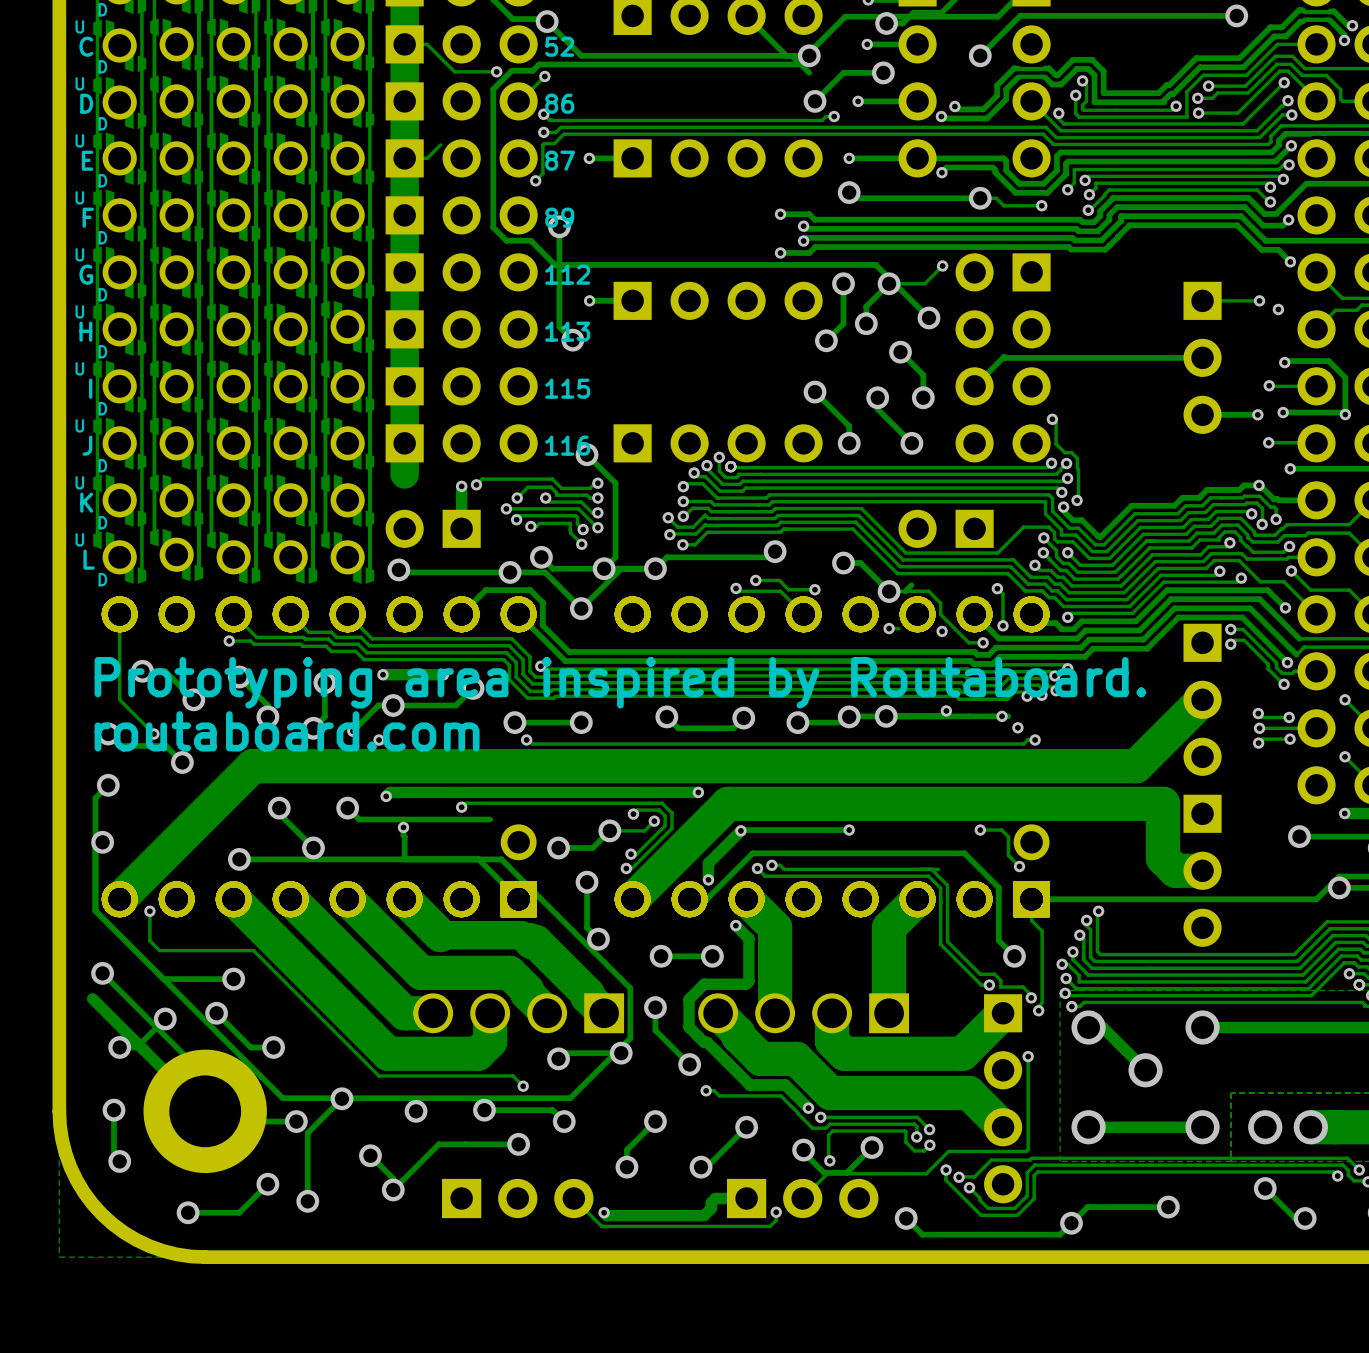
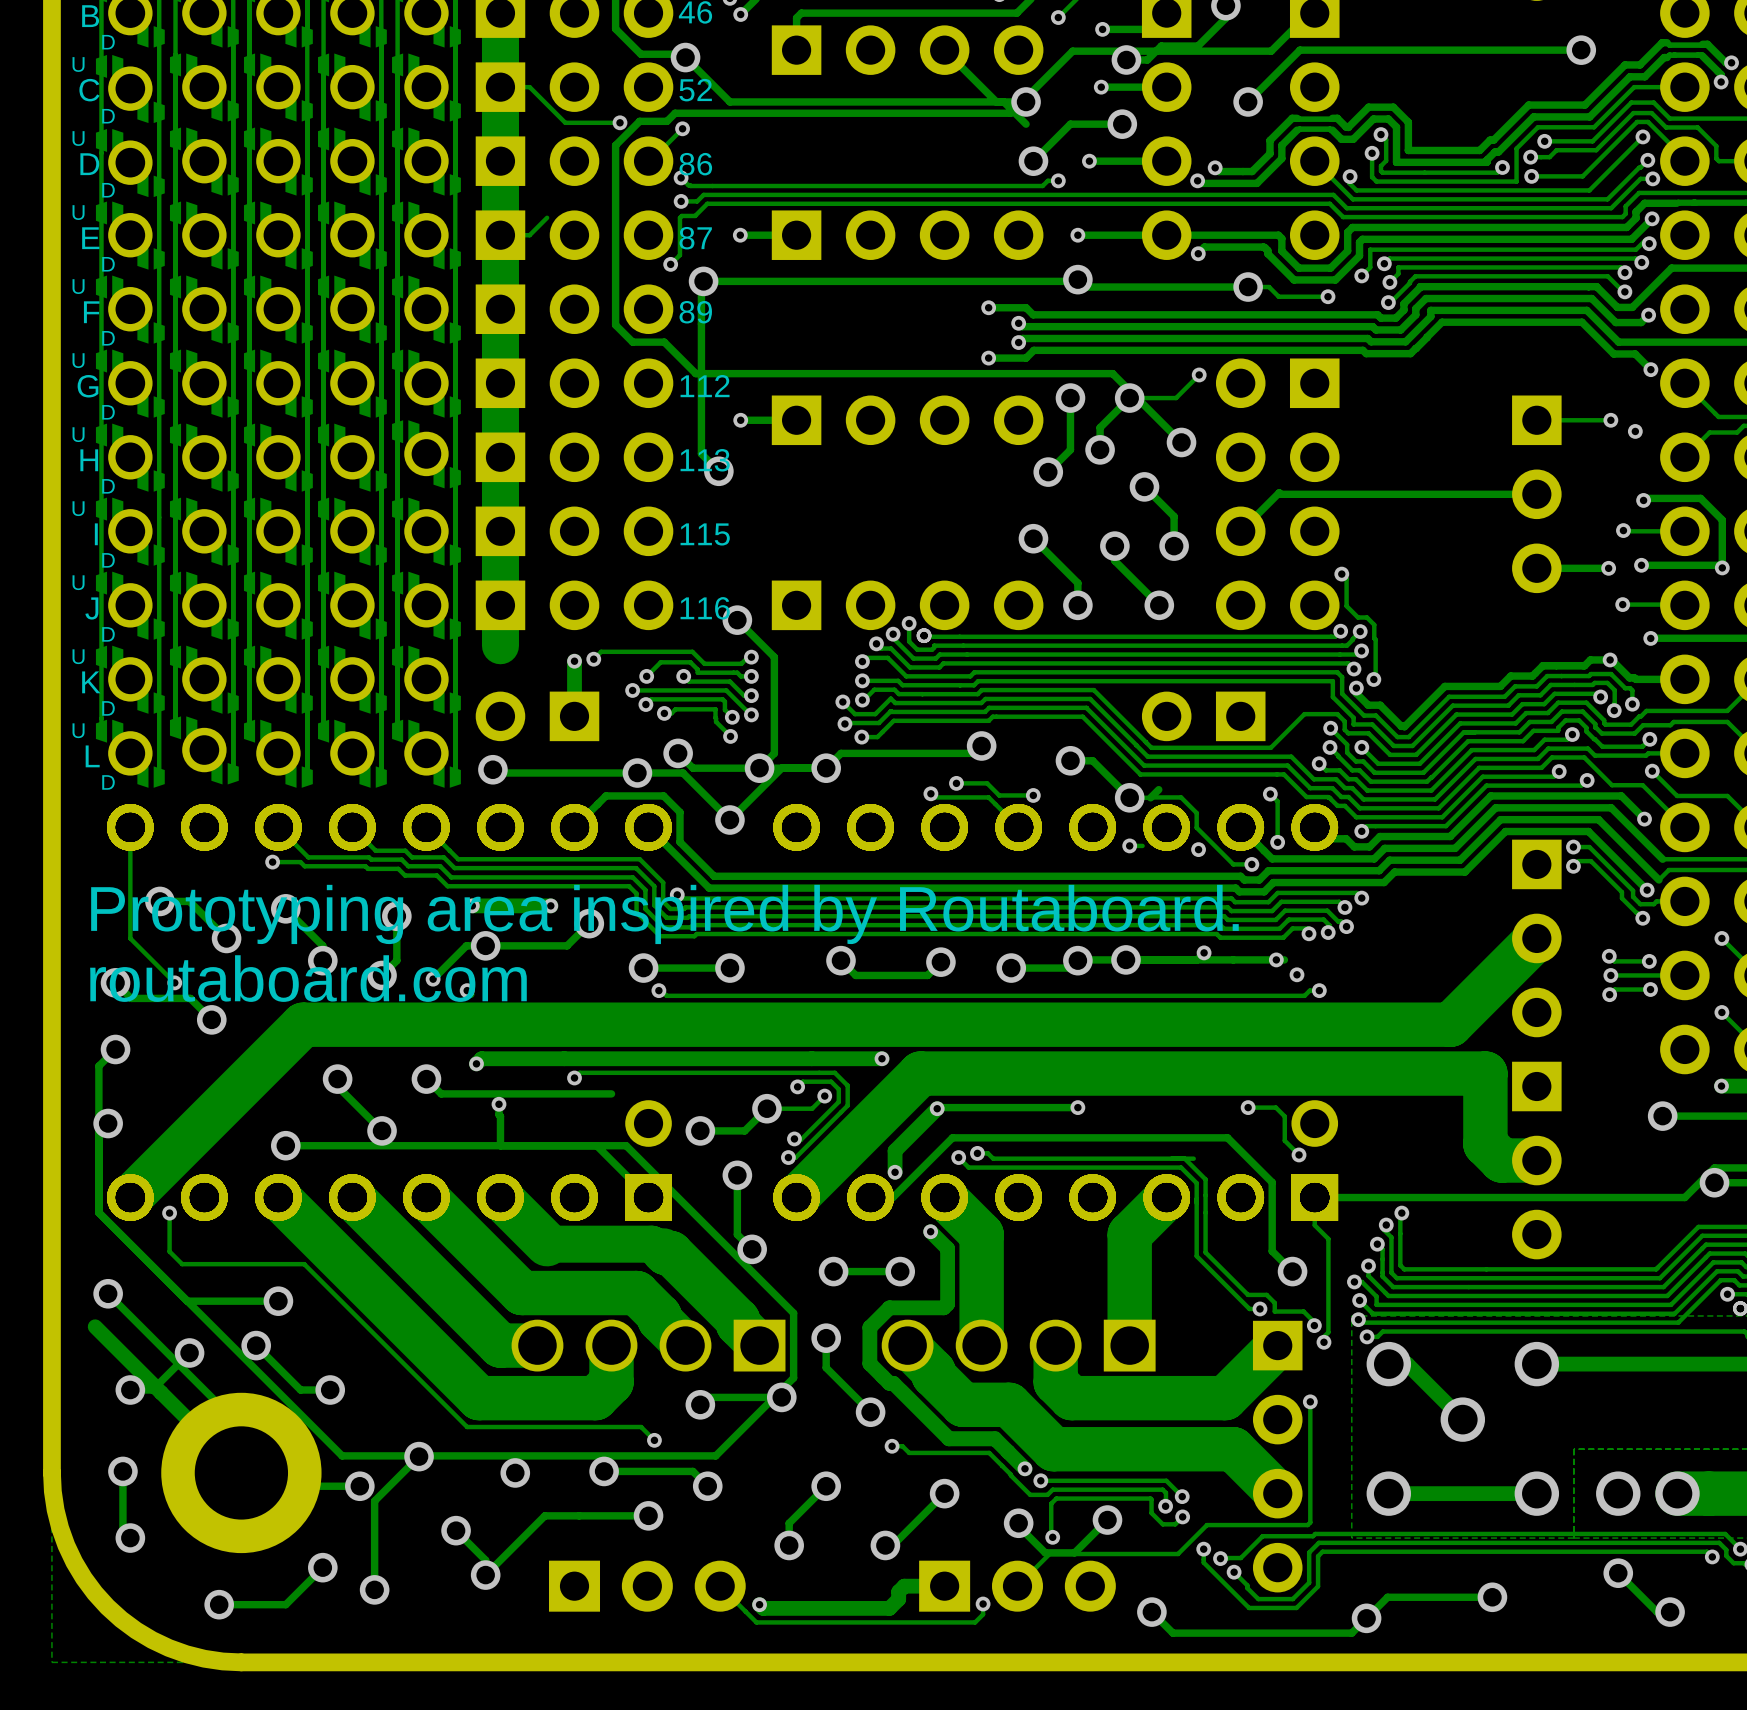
track: none -> (1077, 279) (1076, 281) (703, 281) (701, 283) (701, 324)
via position: (559, 226) -> (703, 281)

